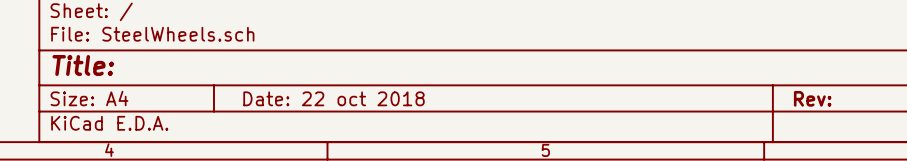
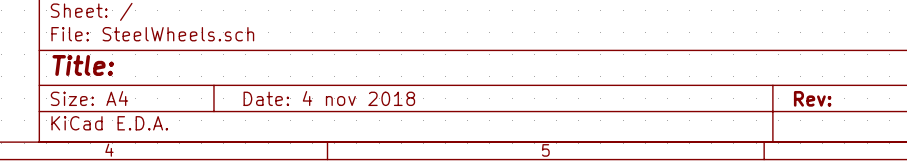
title block: Date: 22 oct 2018 (334, 98) -> Date: 4 nov 2018 (329, 98)

